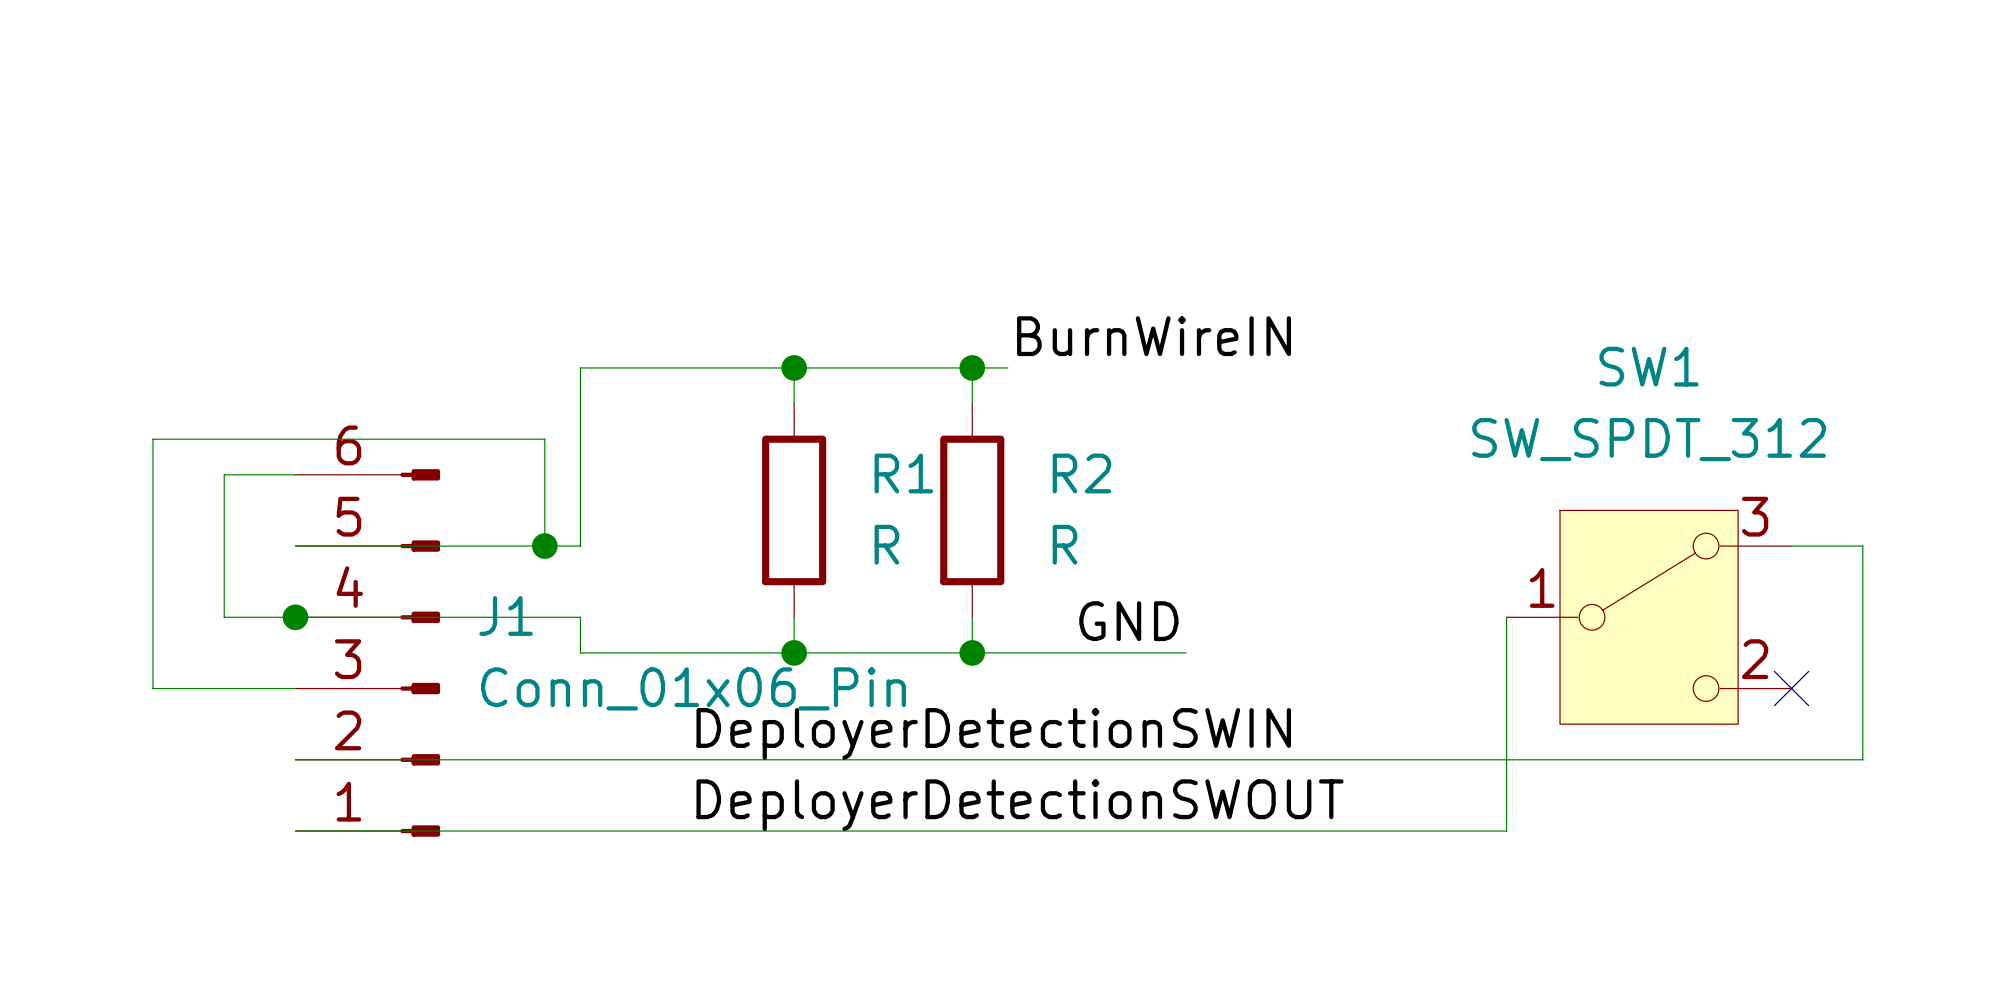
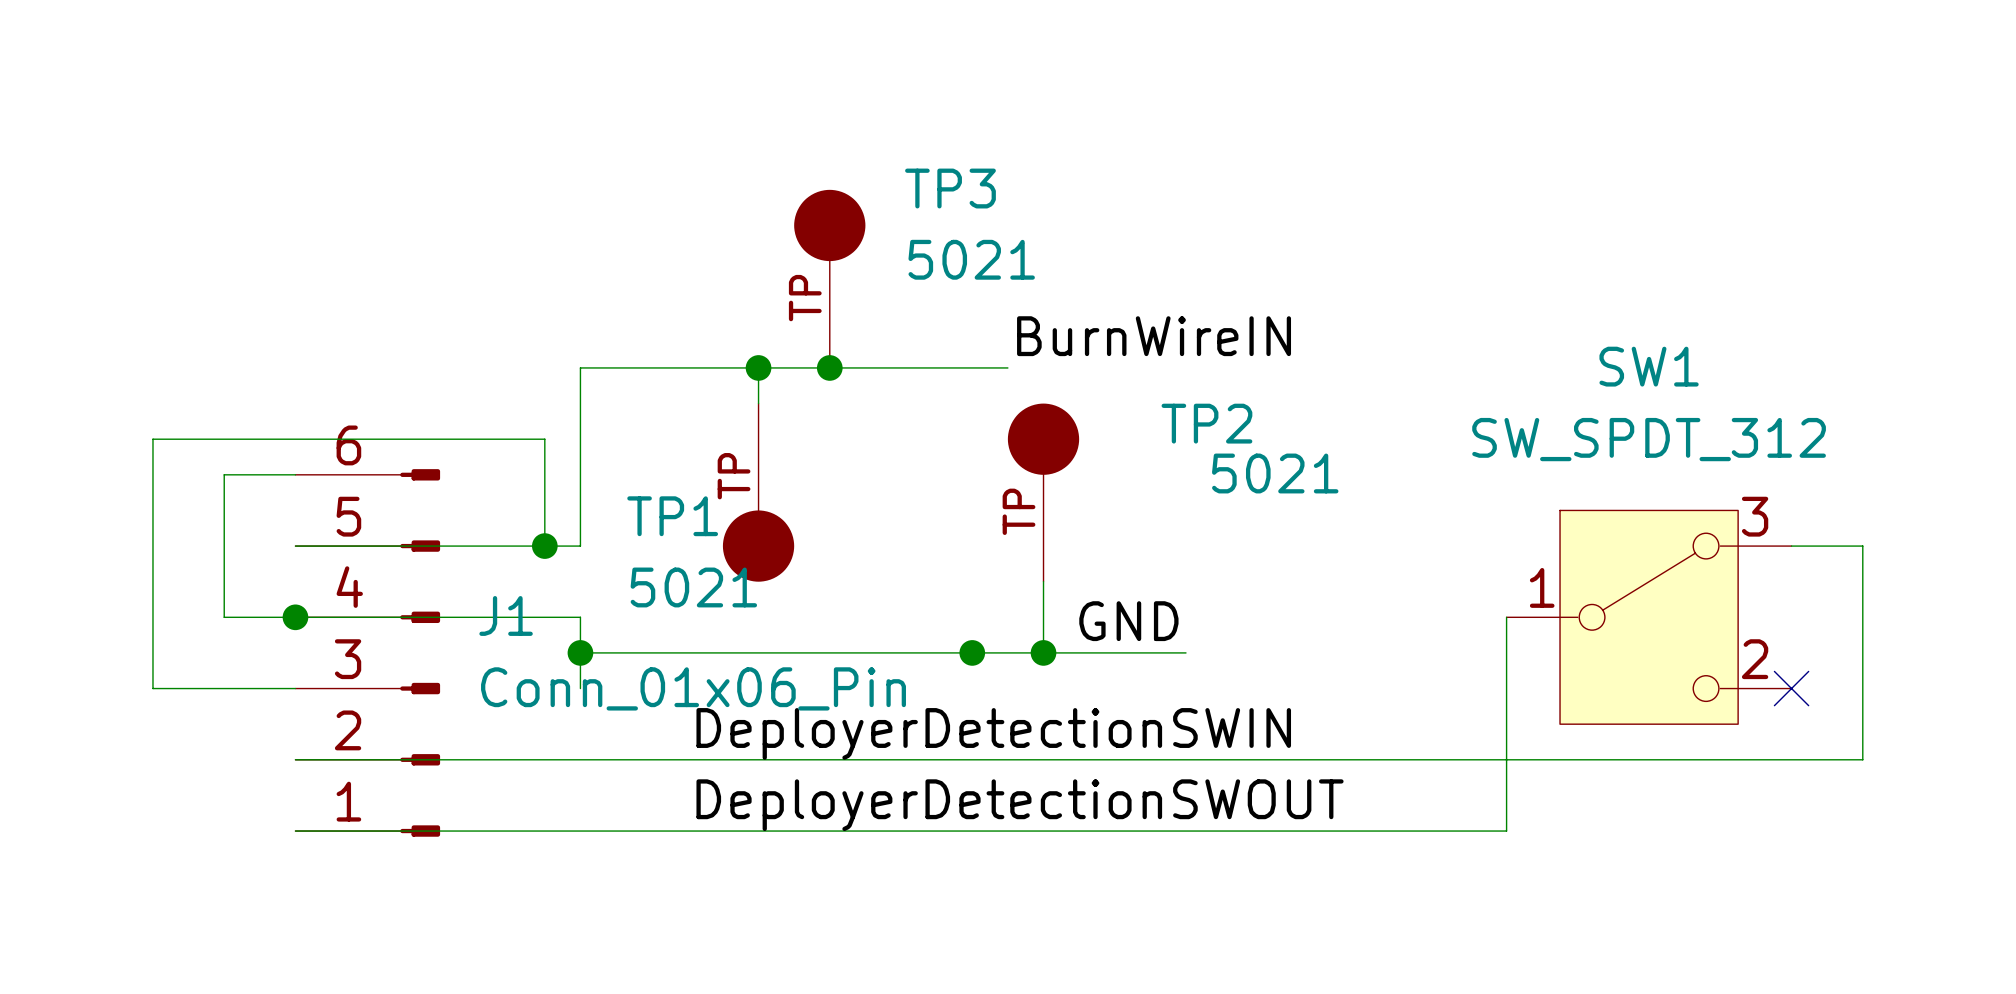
TP3: none -> 5021 (829, 278)
junction: none -> (758, 367)
wire: (794, 367) (794, 403) -> (758, 367) (758, 403)
junction: (794, 367) -> none
junction: none -> (829, 367)
wire: (972, 367) (972, 403) -> none
junction: (972, 367) -> none
TP1: none -> 5021 (758, 492)
TP2: none -> 5021 (1043, 492)
R1: R (794, 510) -> none
R2: R (972, 510) -> none
wire: none -> (1043, 581) (1043, 652)
wire: (794, 617) (794, 652) -> (580, 652) (580, 688)
wire: (972, 617) (972, 652) -> none
junction: none -> (580, 652)
junction: (794, 652) -> none
junction: none -> (1043, 652)

